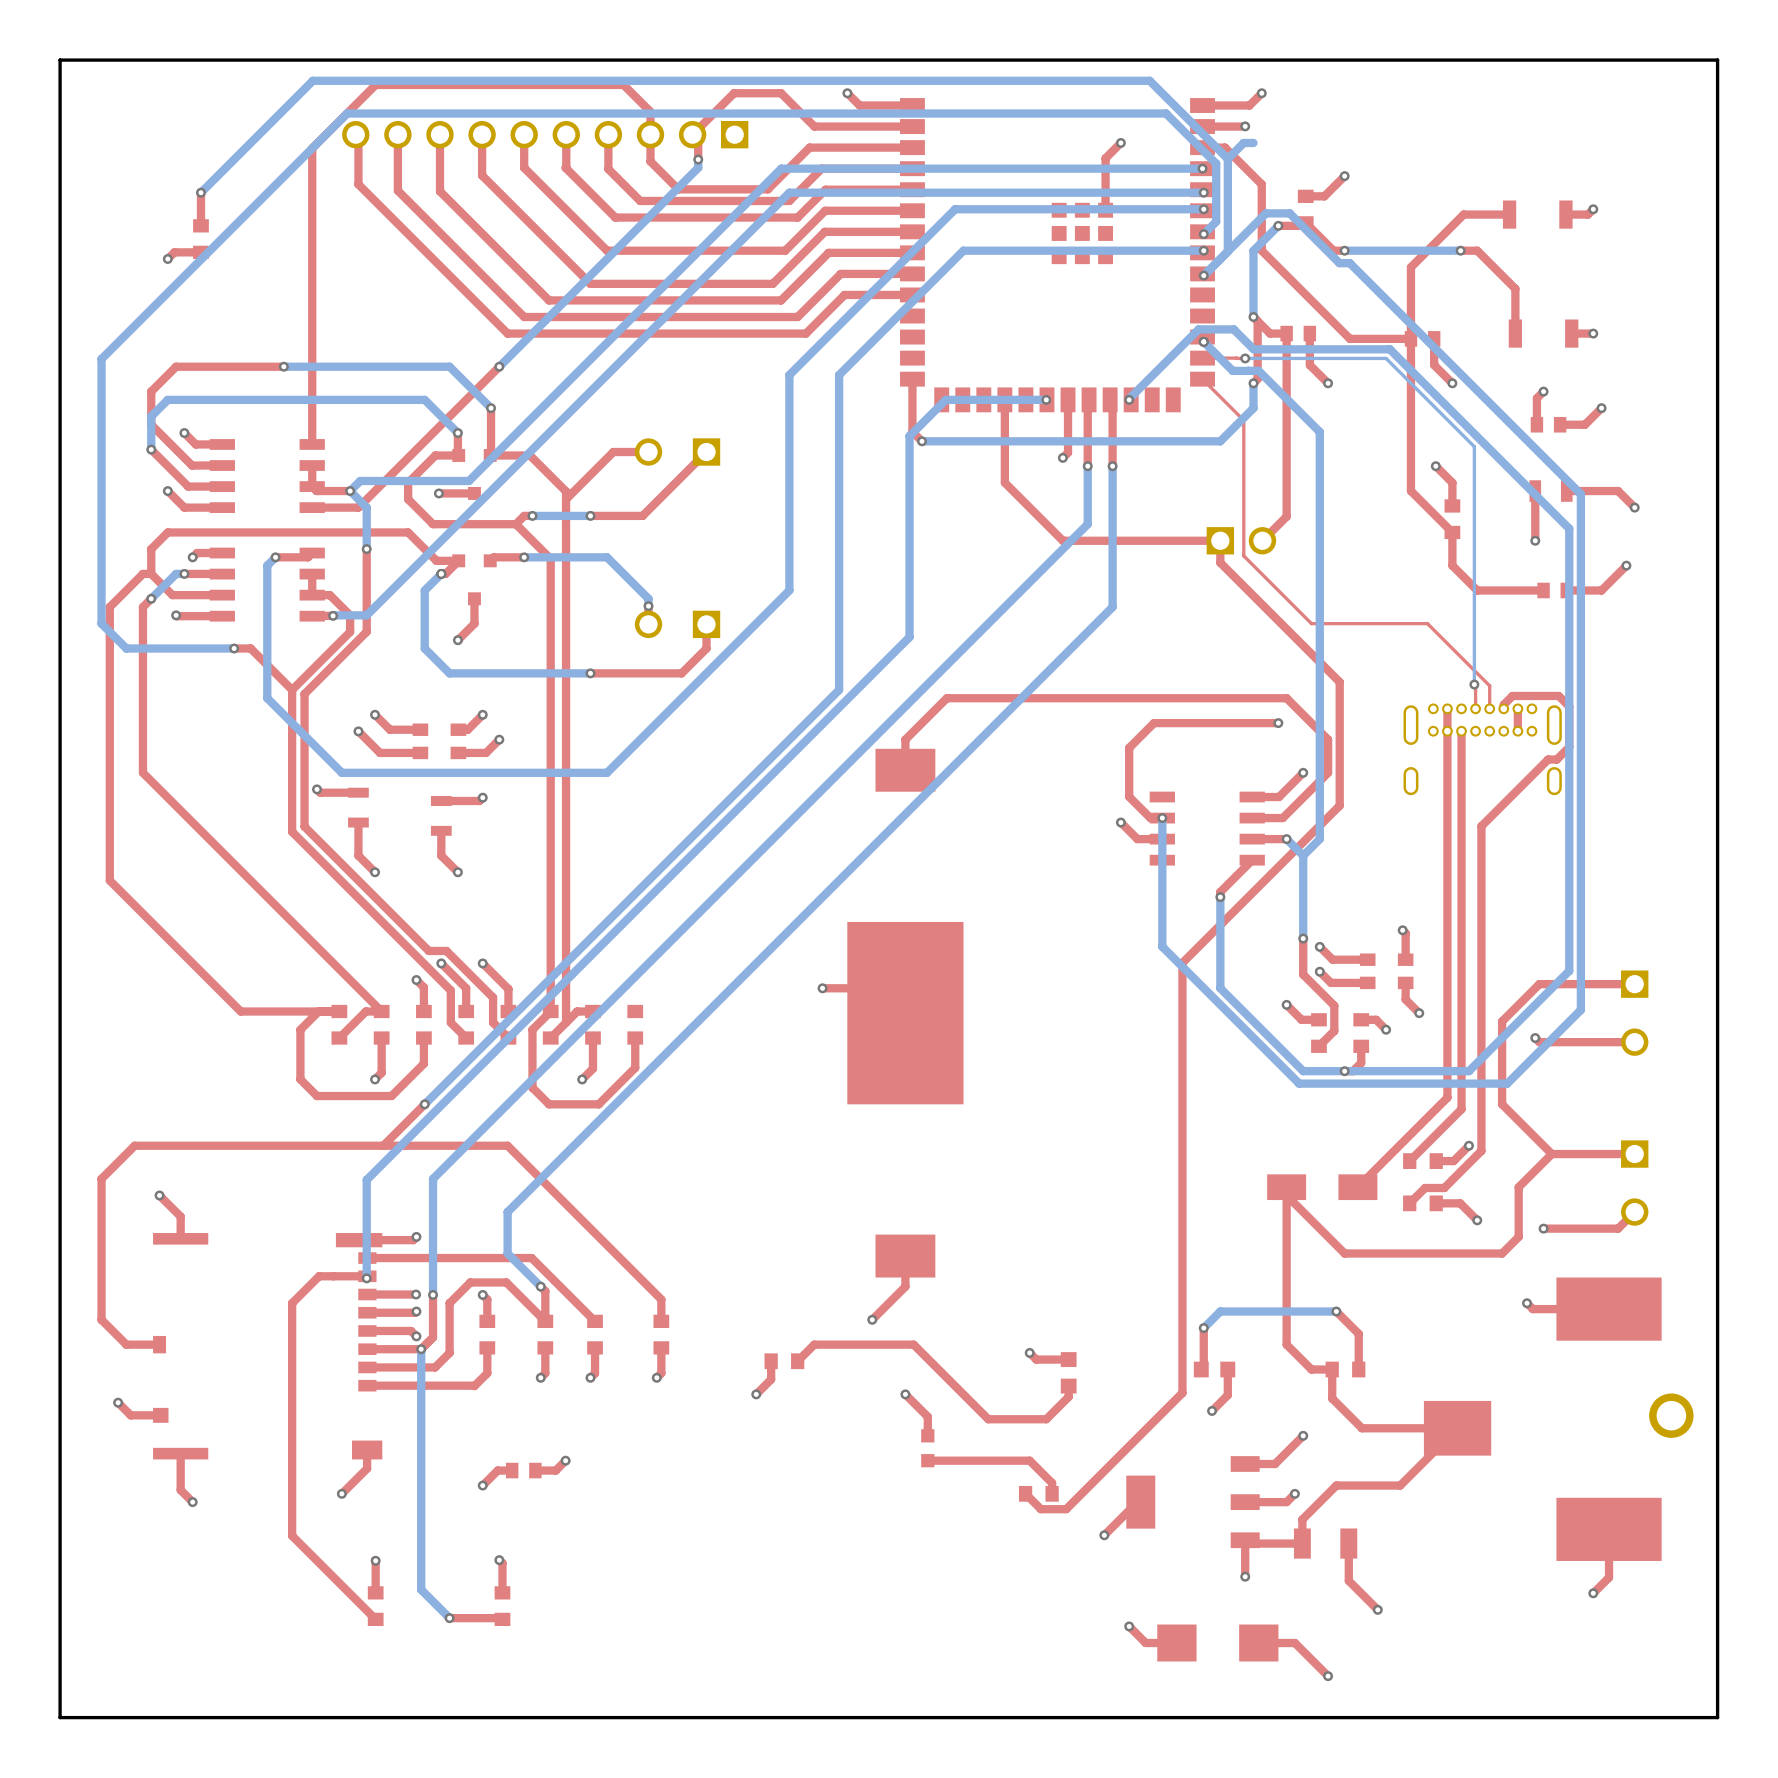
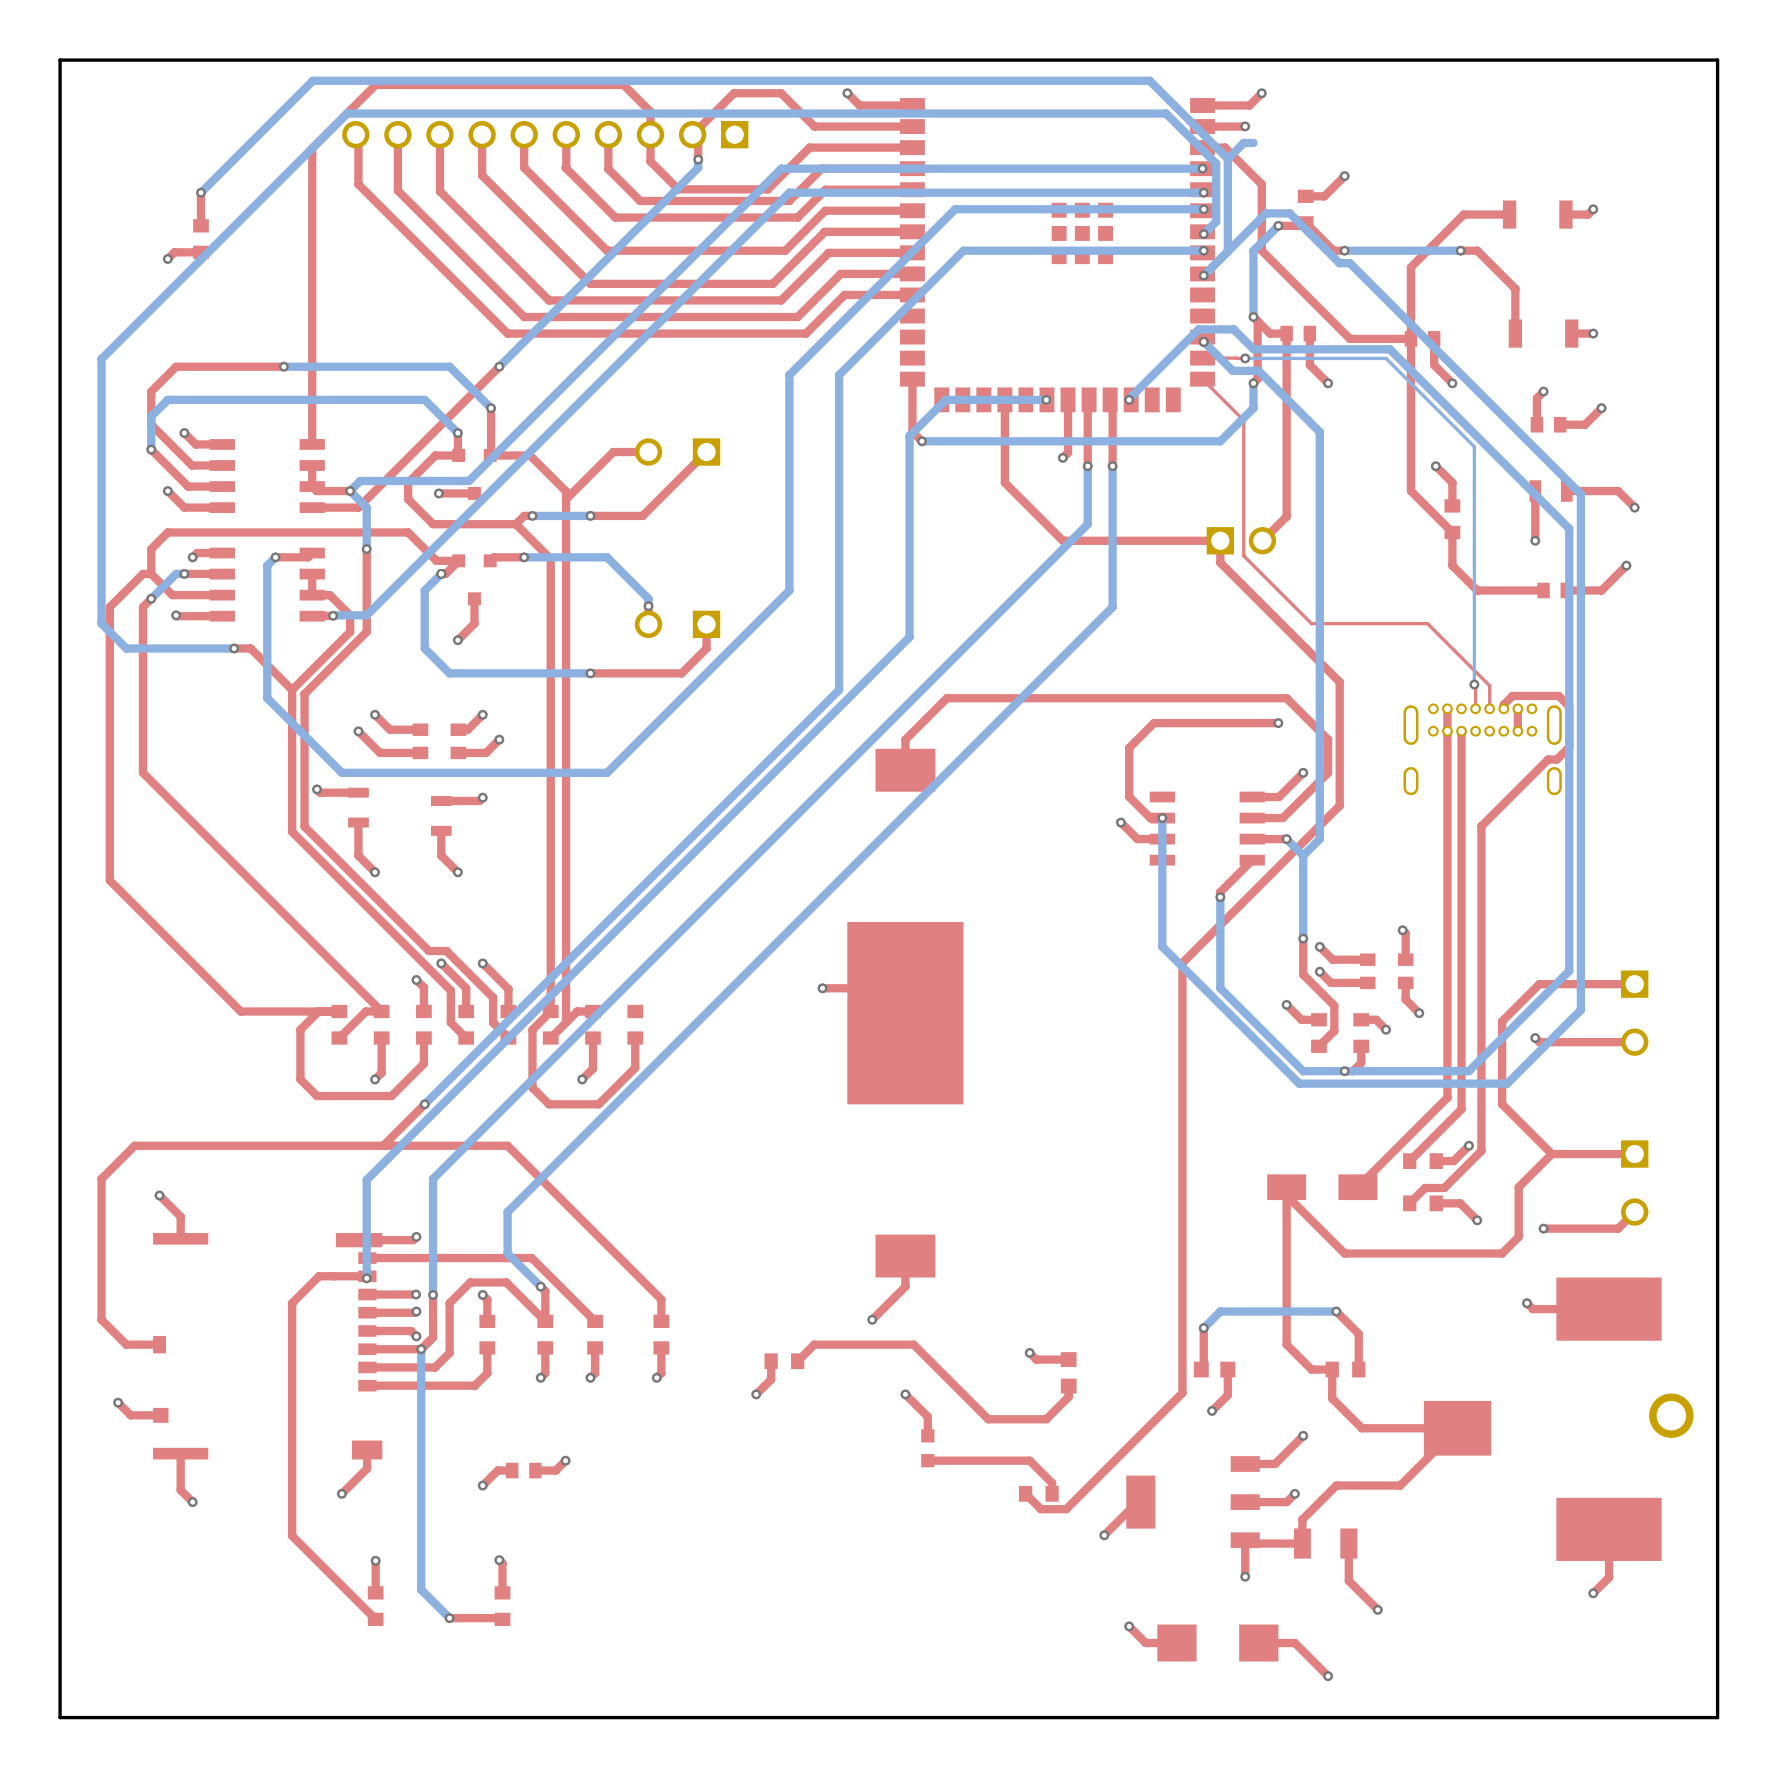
top track: (1120, 142) (1105, 158) (1105, 210) -> none
via: (1120, 142) -> none

